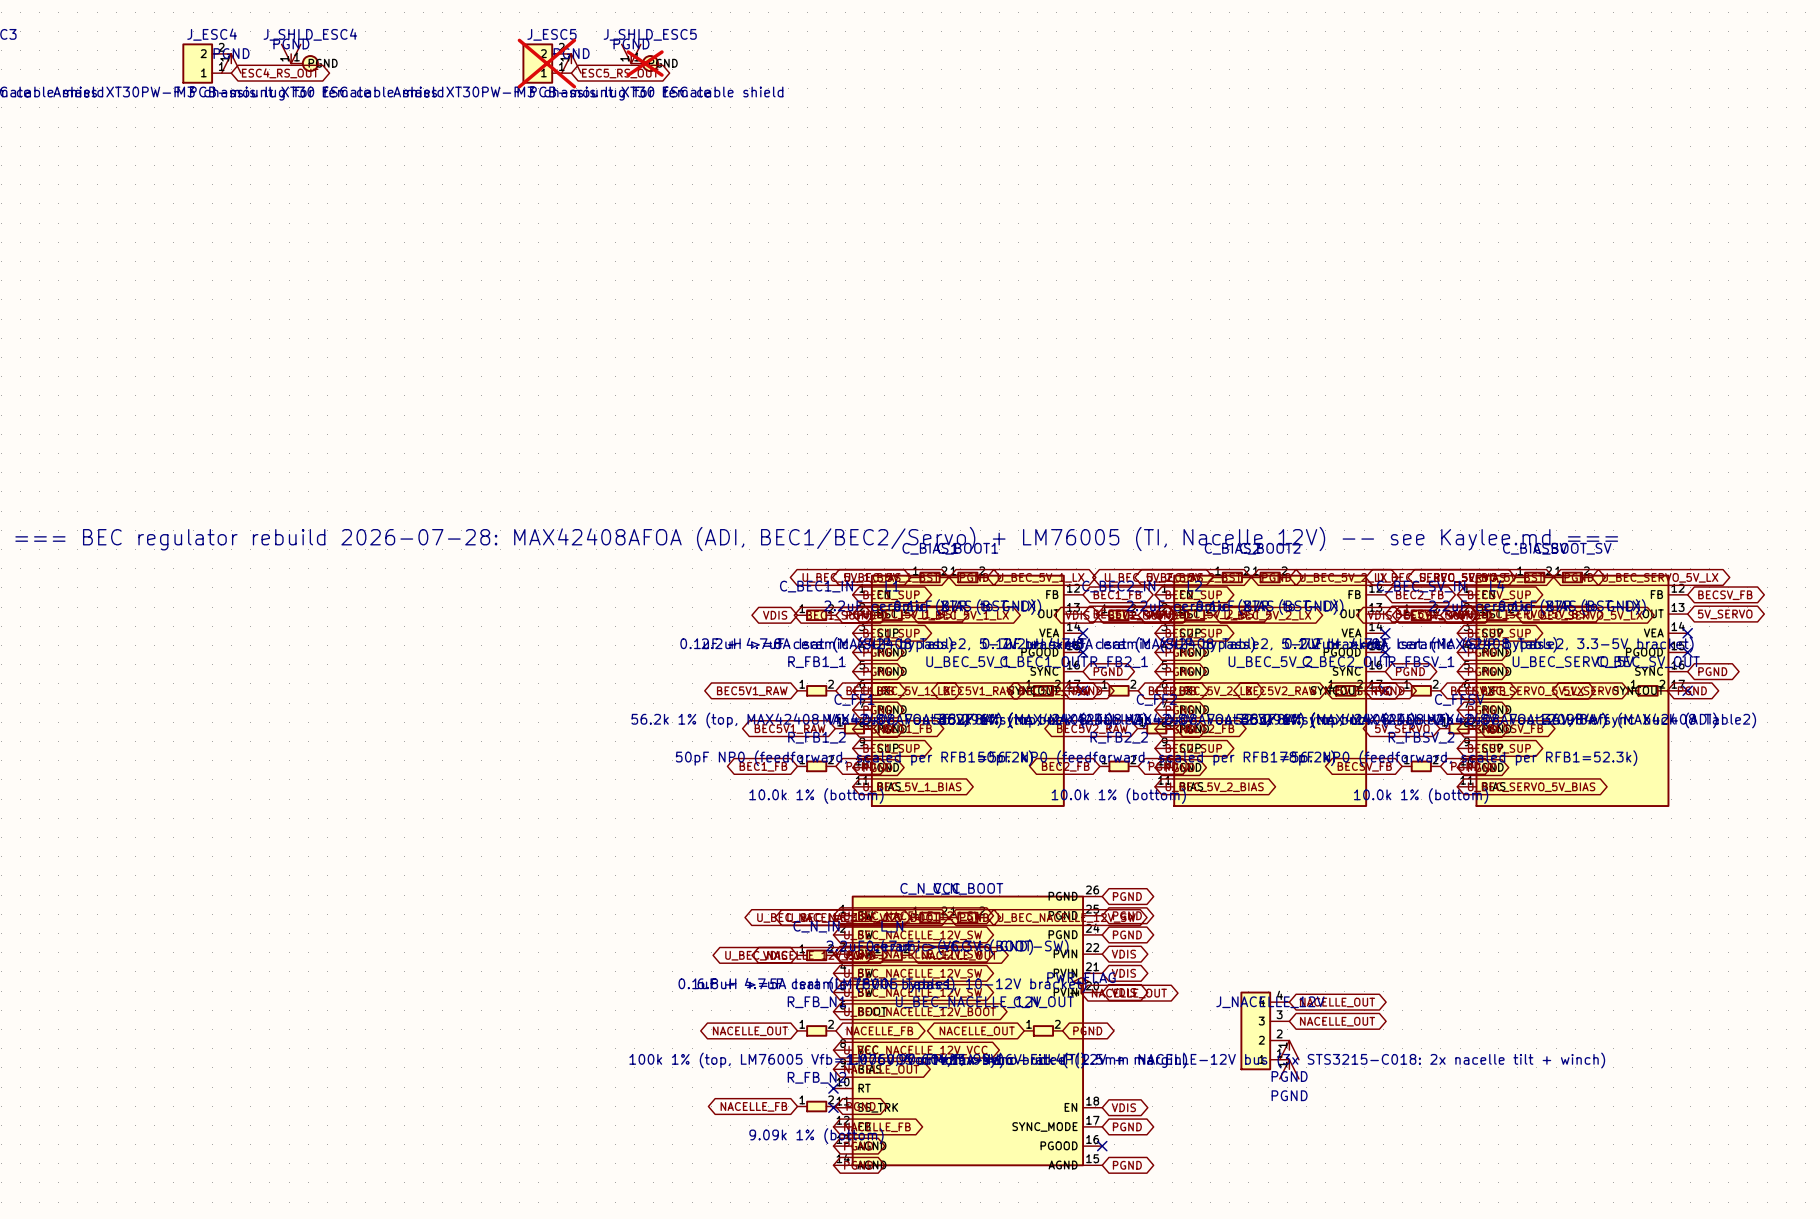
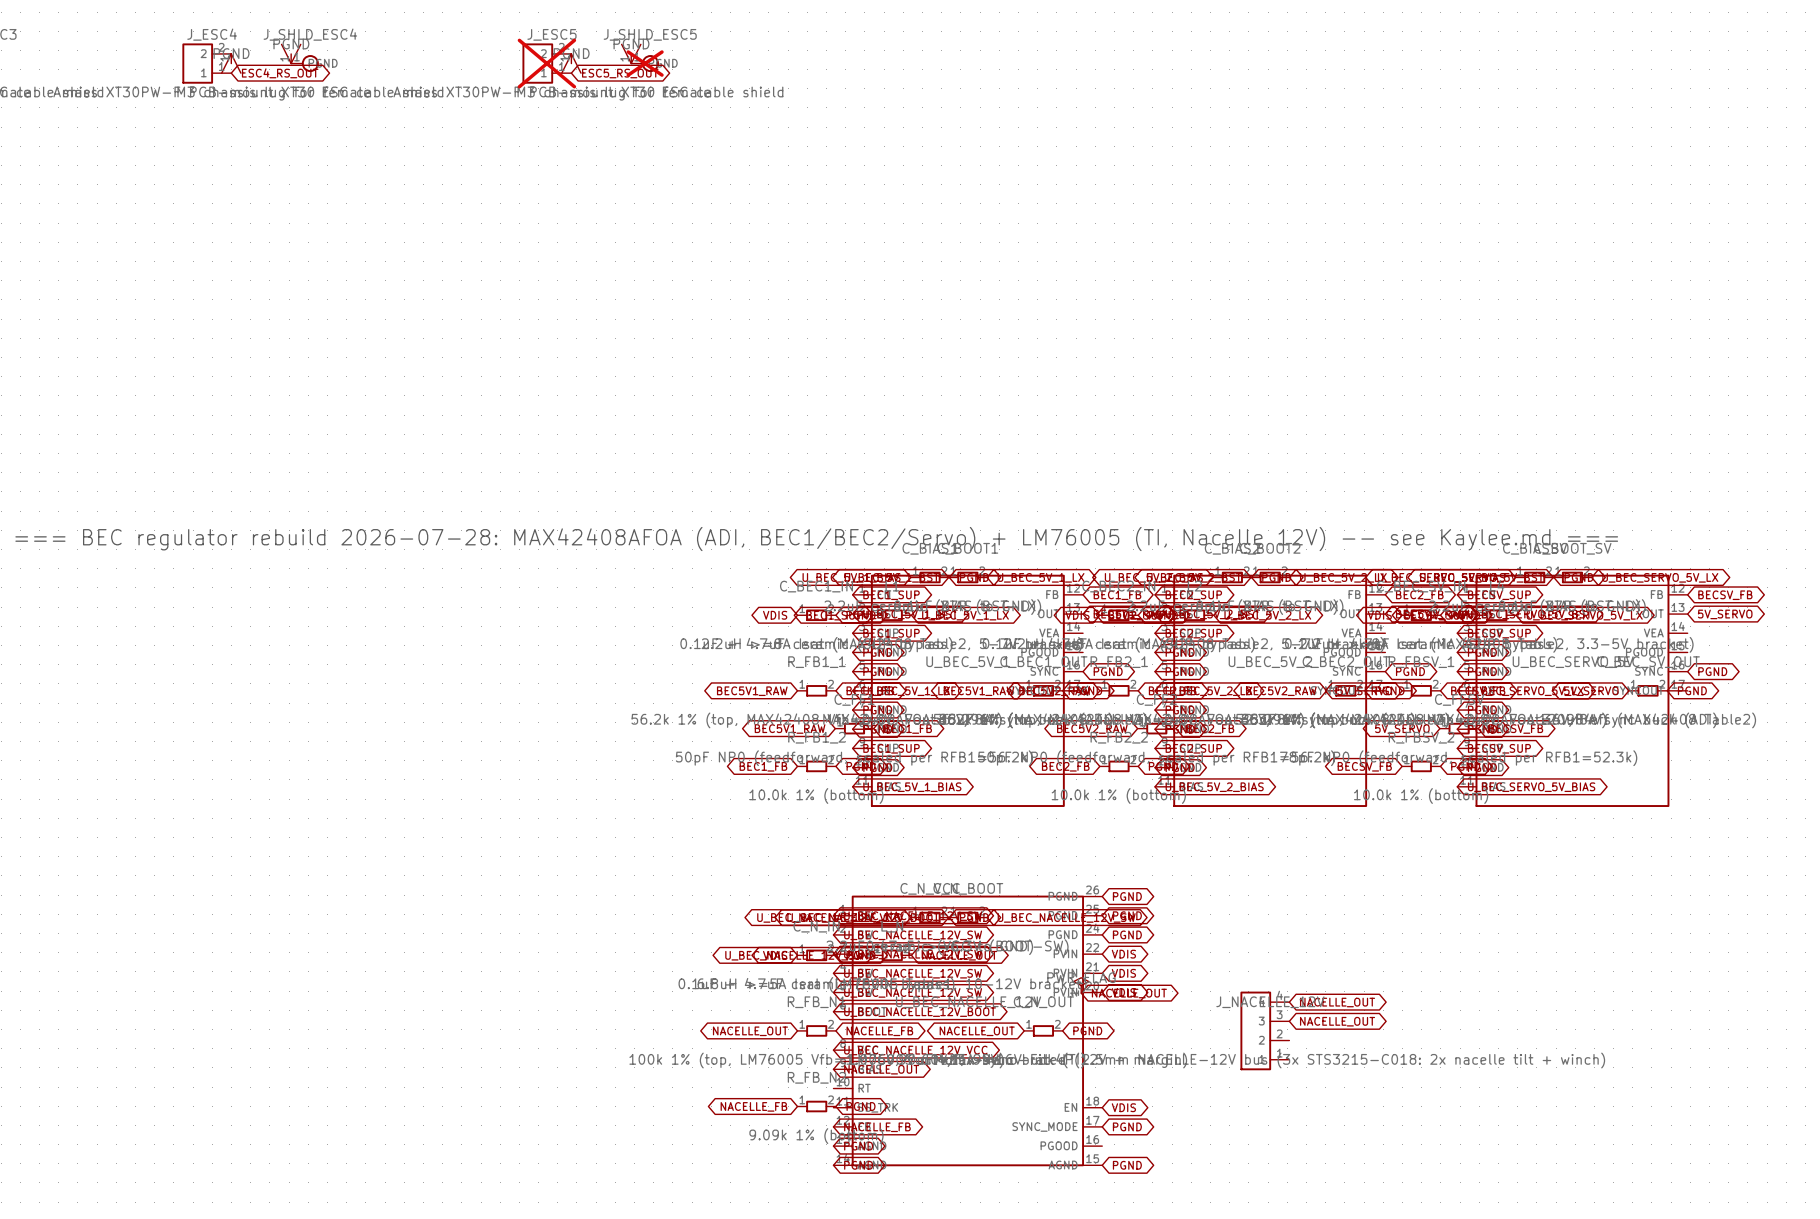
no-connect mark: (1083, 633) -> none
no-connect mark: (1385, 633) -> none
no-connect mark: (1687, 633) -> none
no-connect mark: (1083, 652) -> none
no-connect mark: (1385, 652) -> none
no-connect mark: (1687, 652) -> none
no-connect mark: (1385, 690) -> none
no-connect mark: (1687, 690) -> none
power symbol: PGND (1289, 1050) -> none
power symbol: PGND (1289, 1069) -> none
no-connect mark: (833, 1088) -> none
no-connect mark: (833, 1107) -> none
no-connect mark: (1102, 1146) -> none

